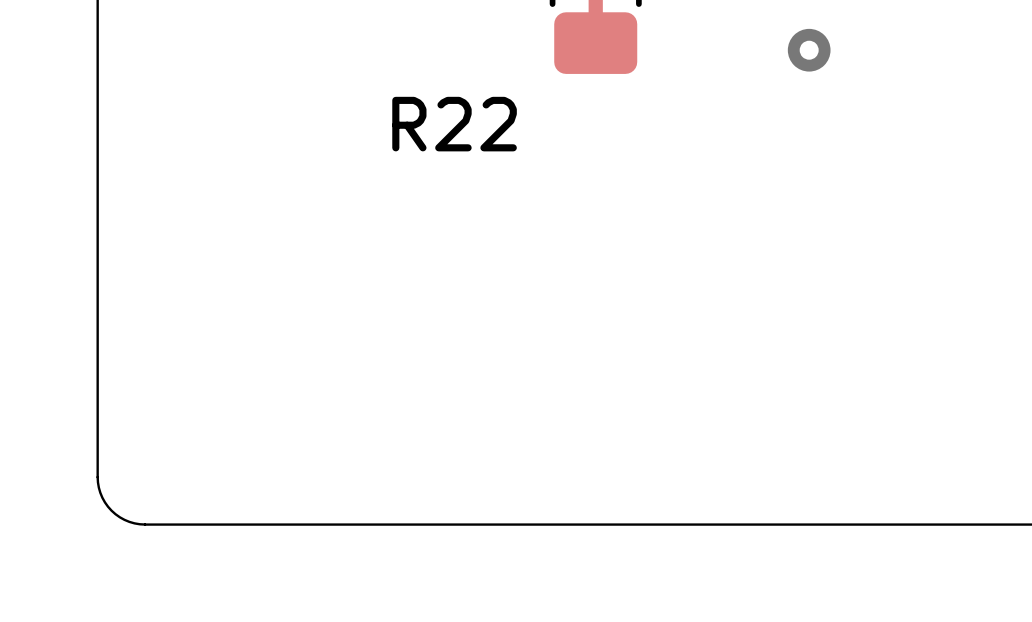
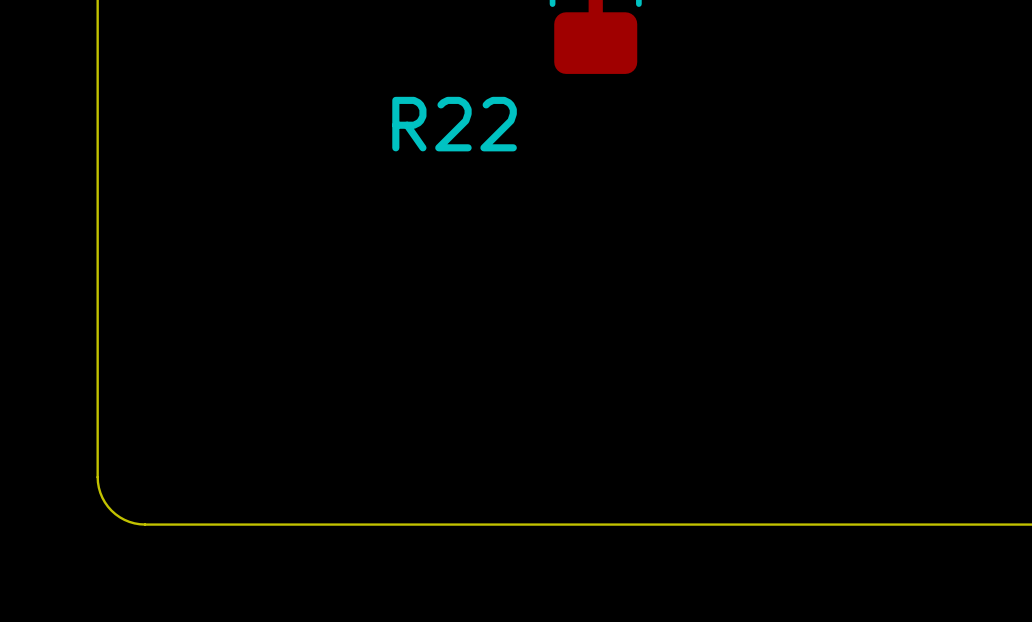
via: (809, 50) -> none

